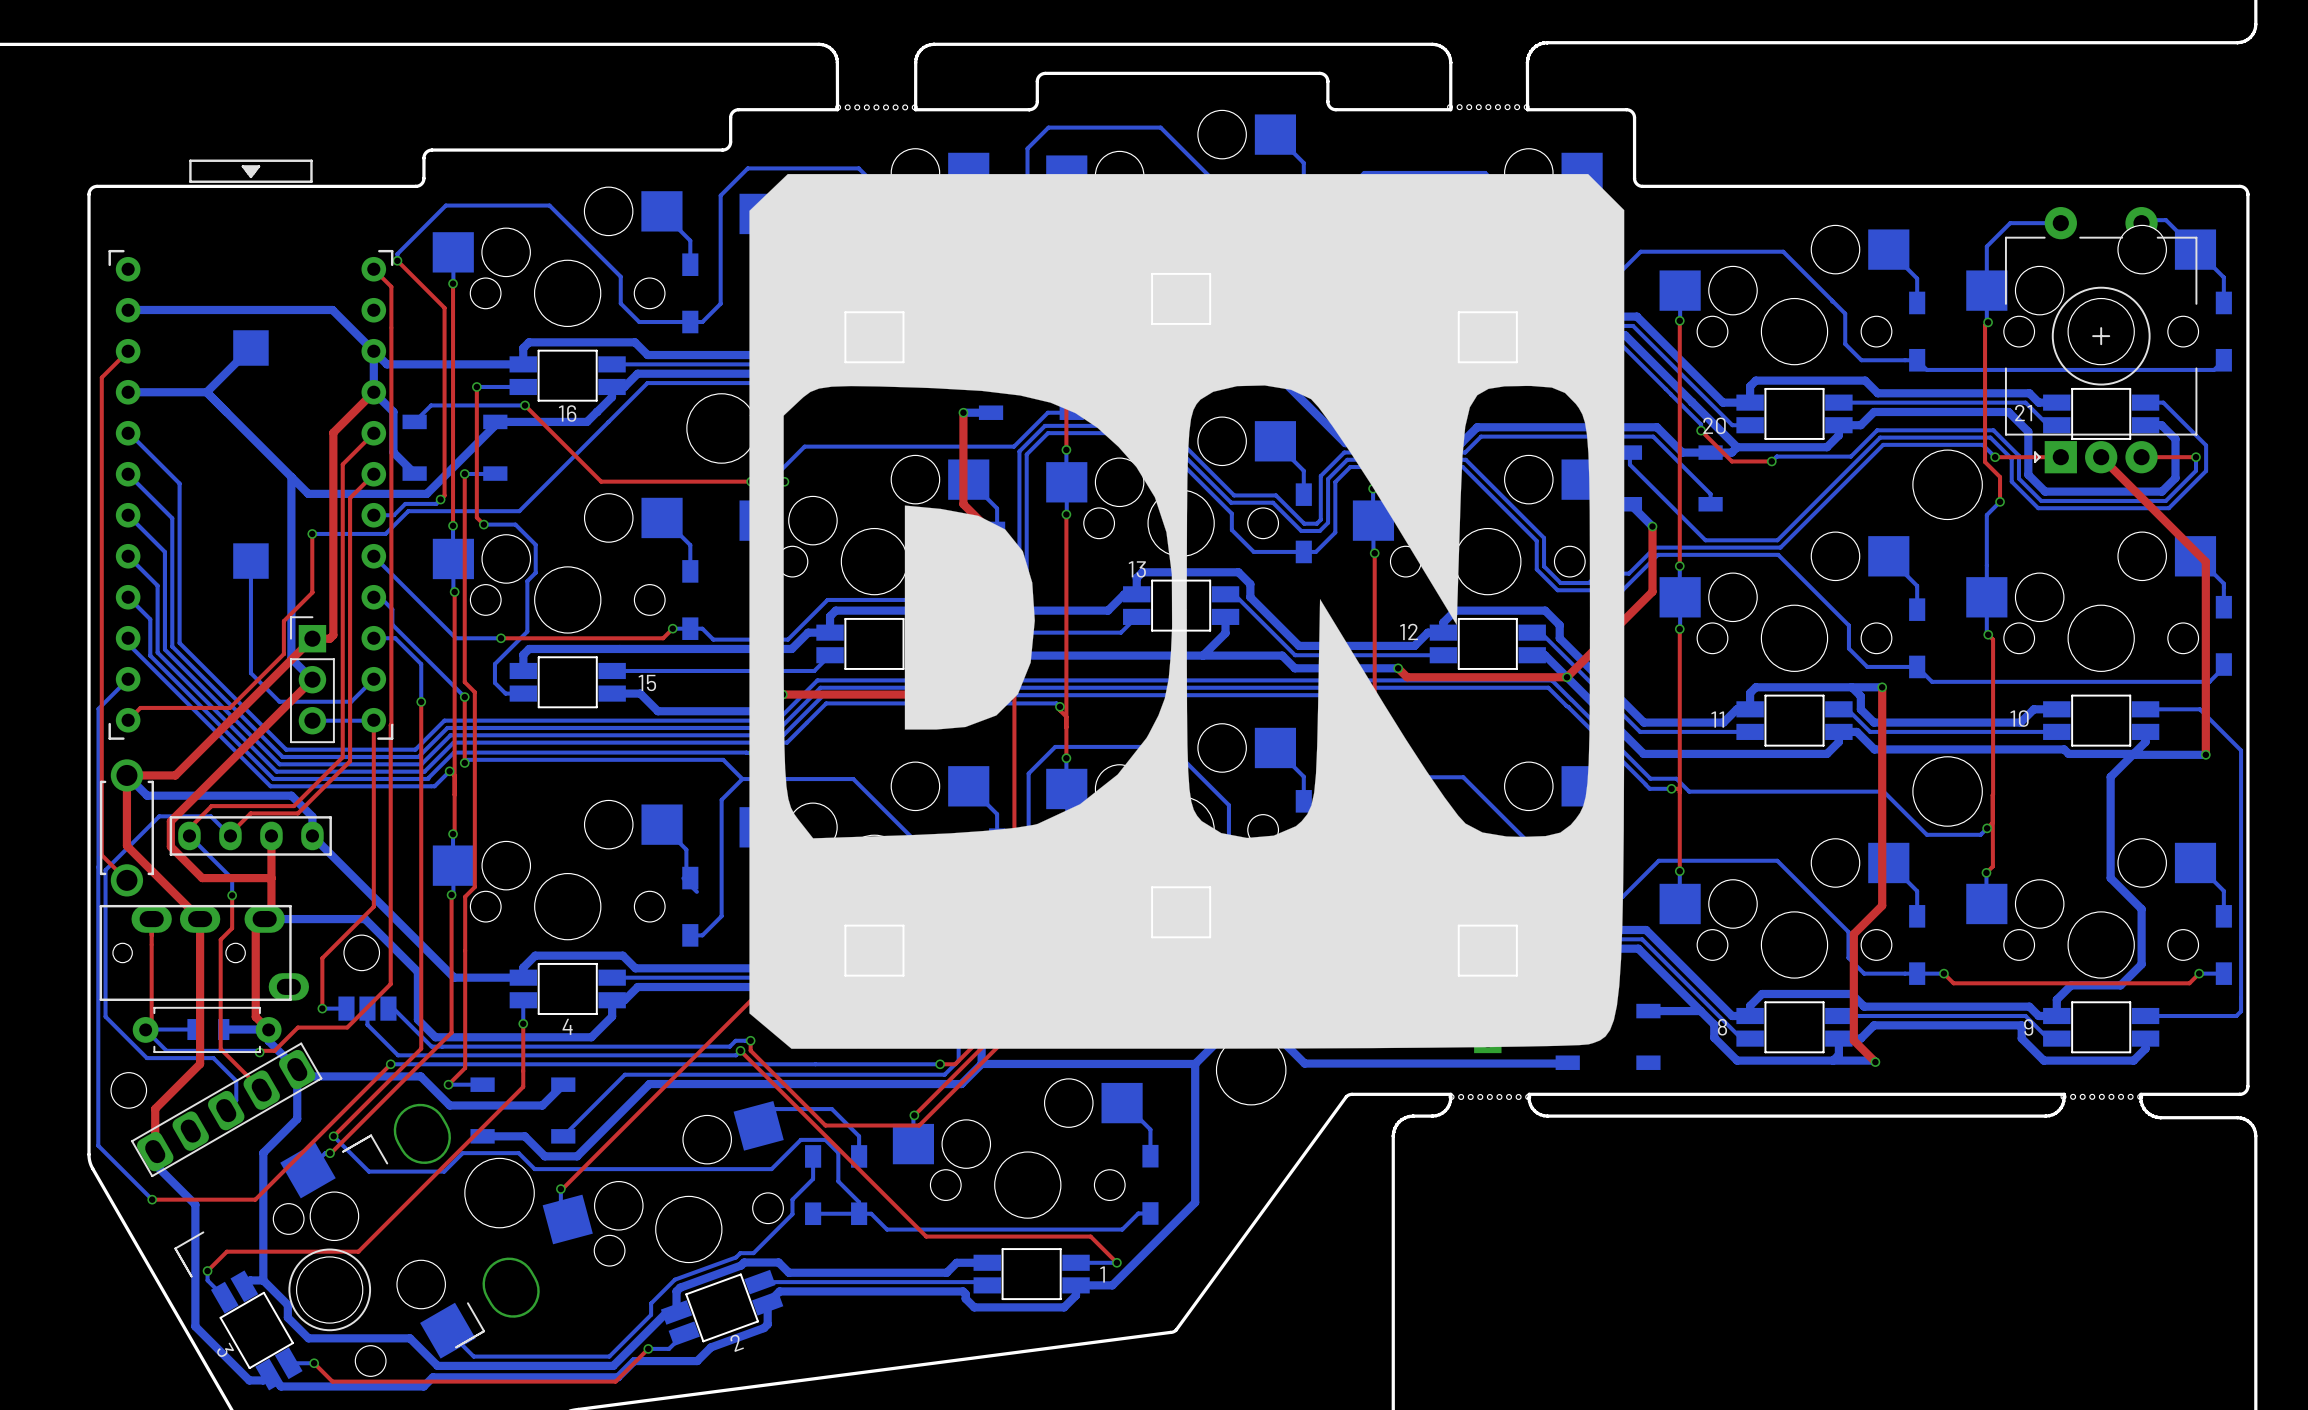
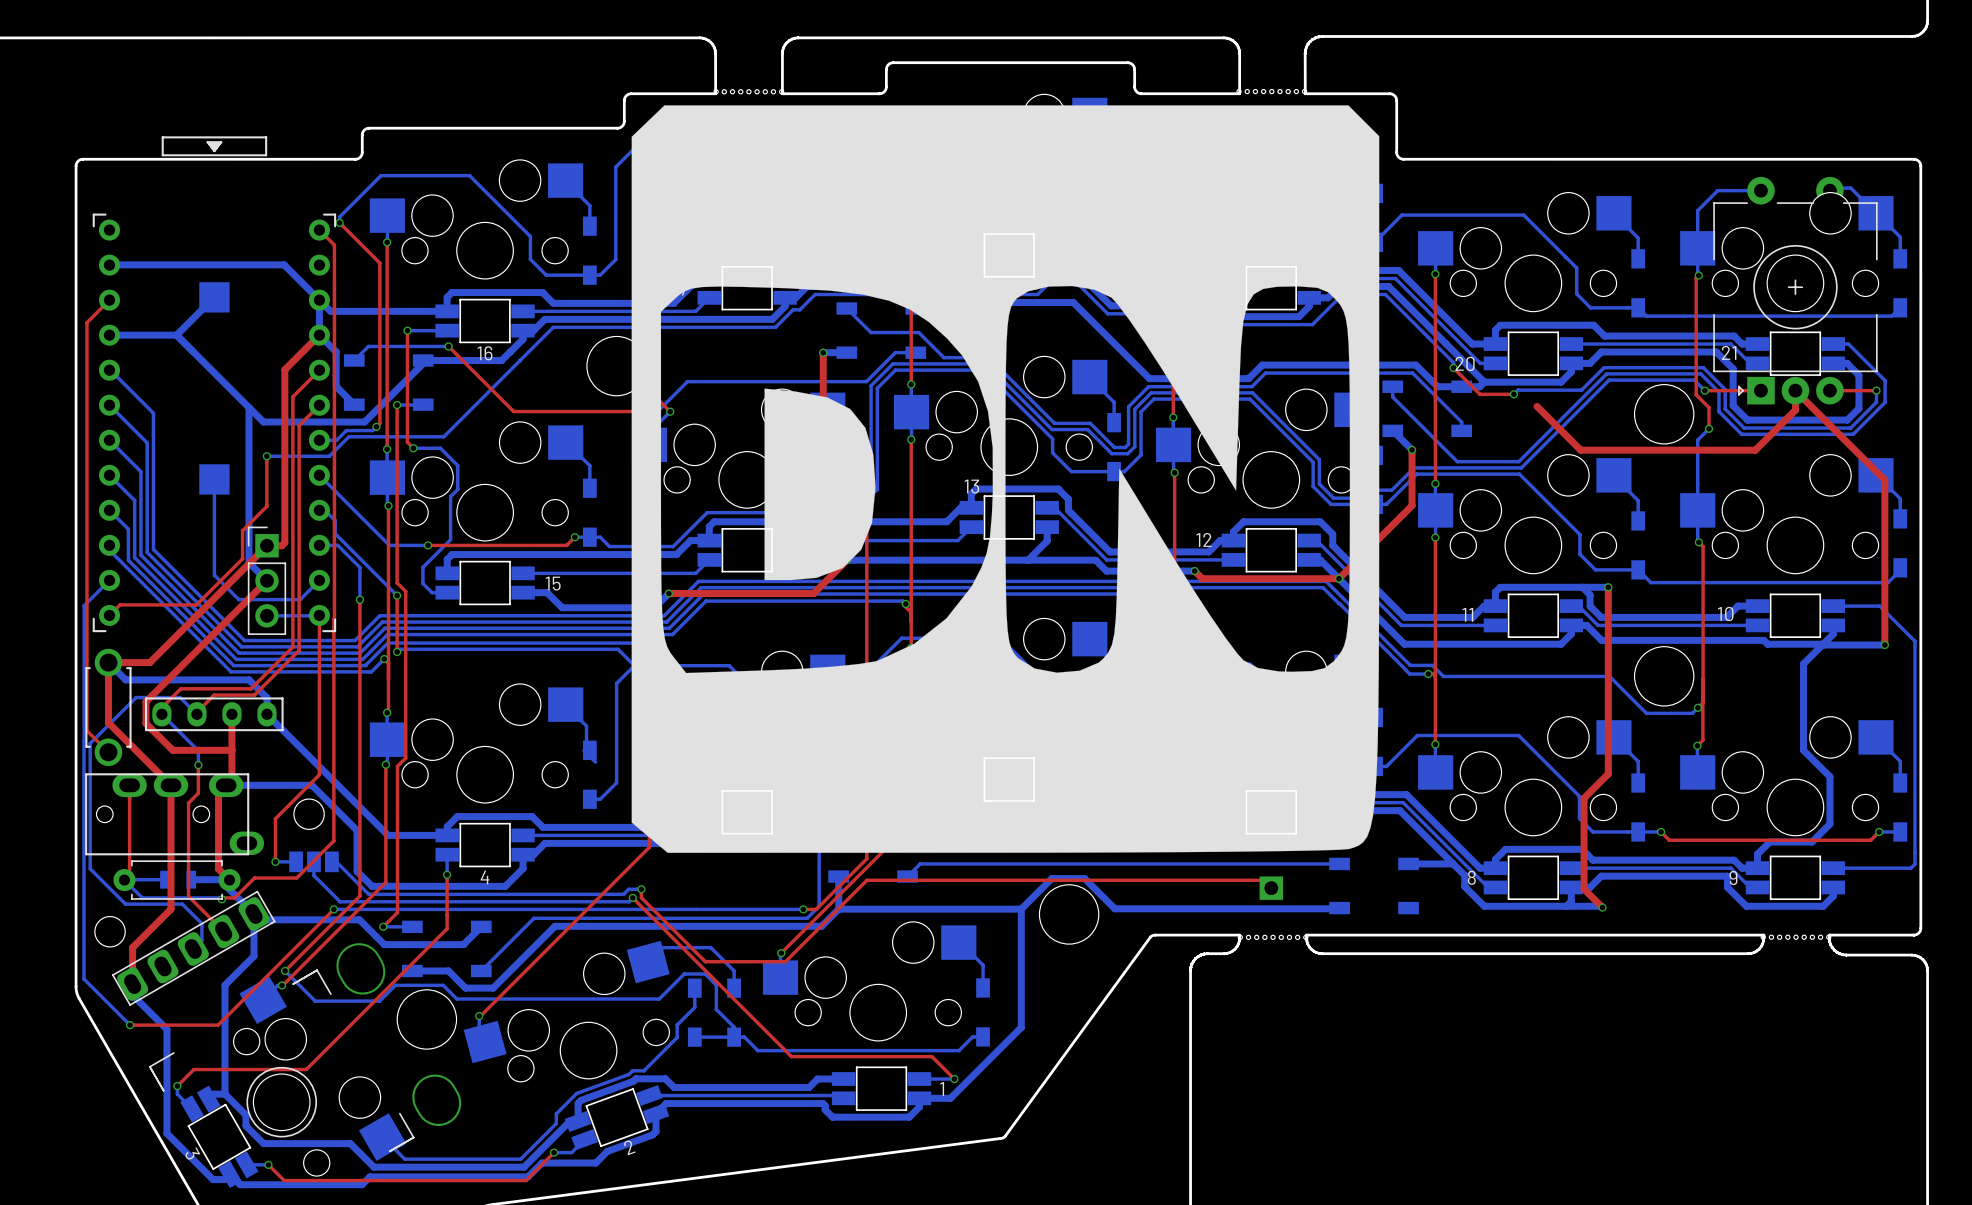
top track: none -> (1795, 390) (1795, 410) (1755, 450) (1580, 450) (1536, 406)
drawing position: (1186, 611) -> (1005, 479)

